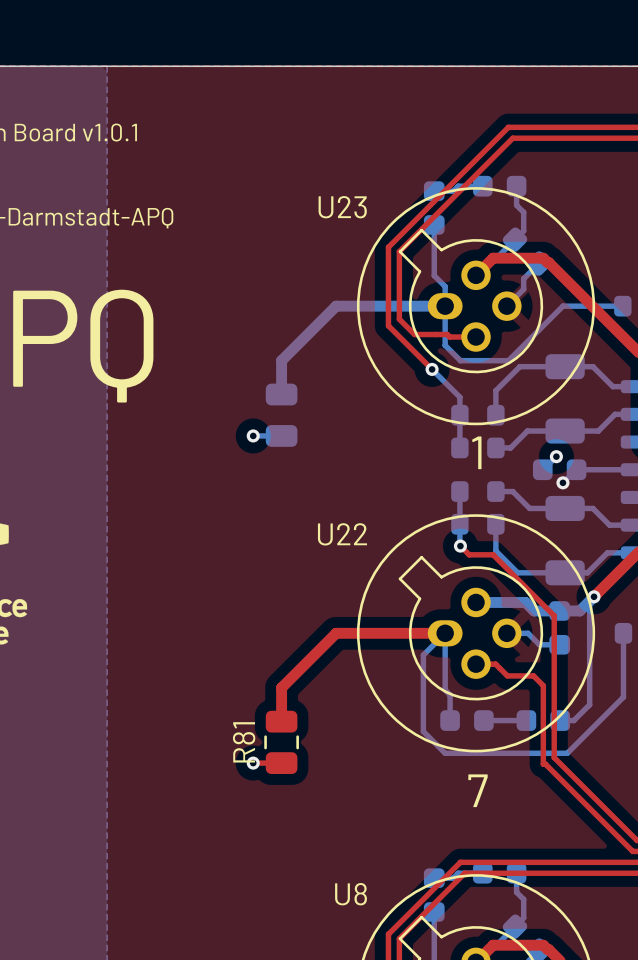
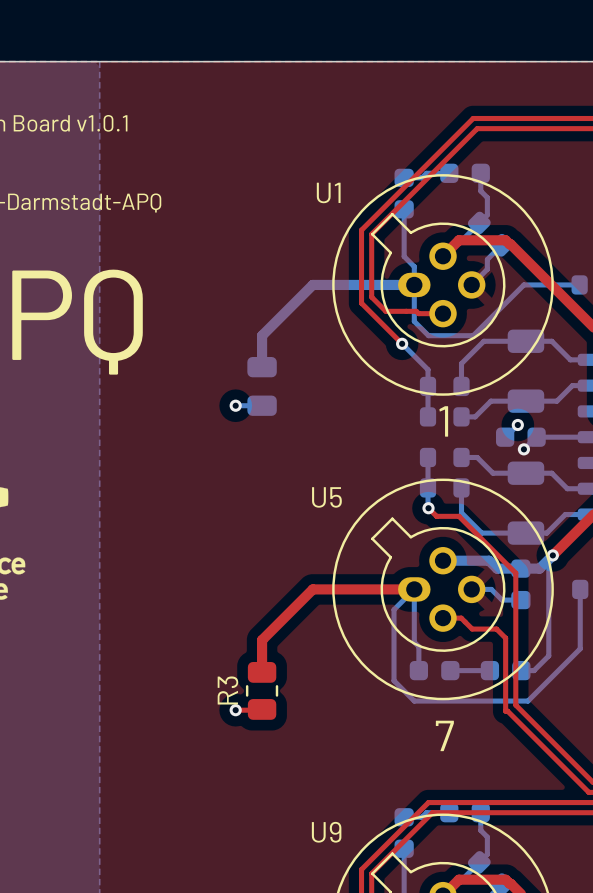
U23 name: U23 (342, 207) -> U1 (328, 192)
U22 name: U22 (342, 534) -> U5 (326, 497)
R81: (281, 742) -> none
R3: none -> (262, 690)
U8 name: U8 (351, 894) -> U9 (326, 832)

